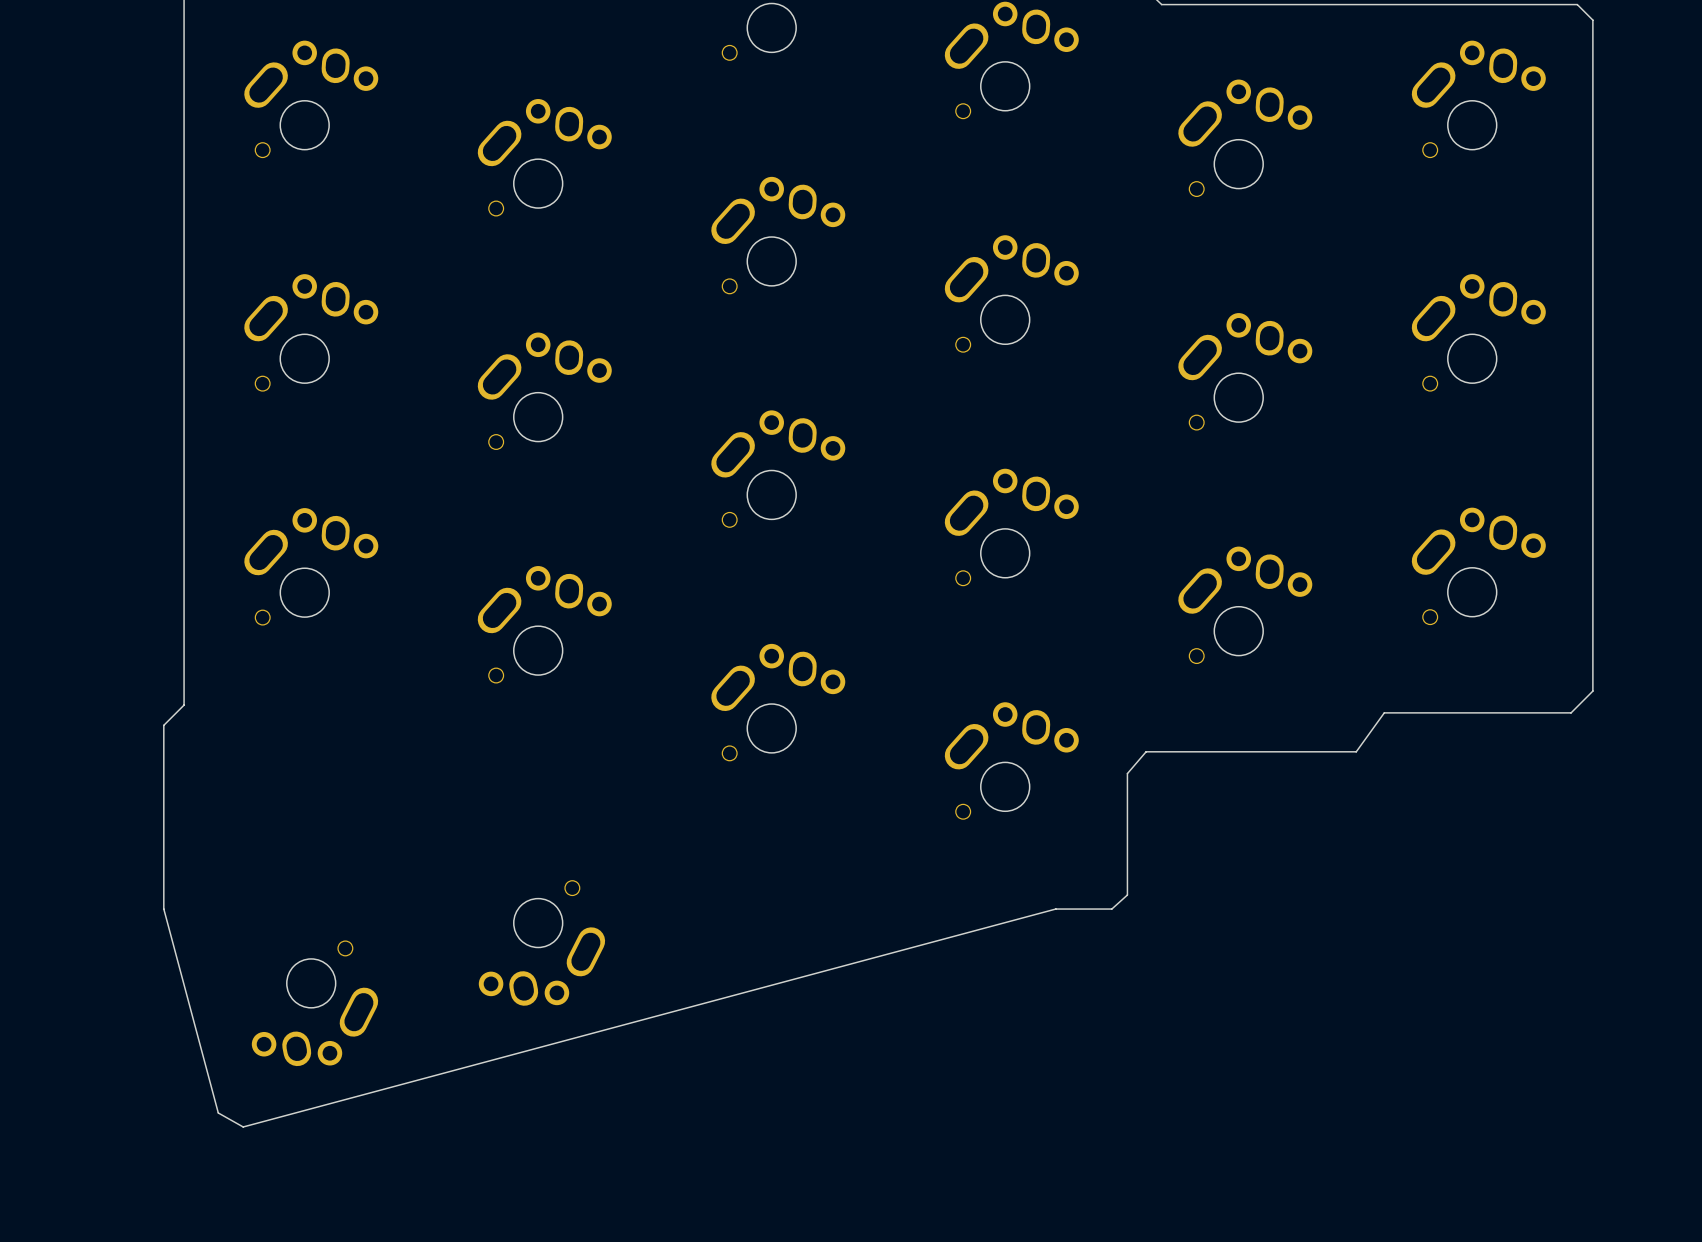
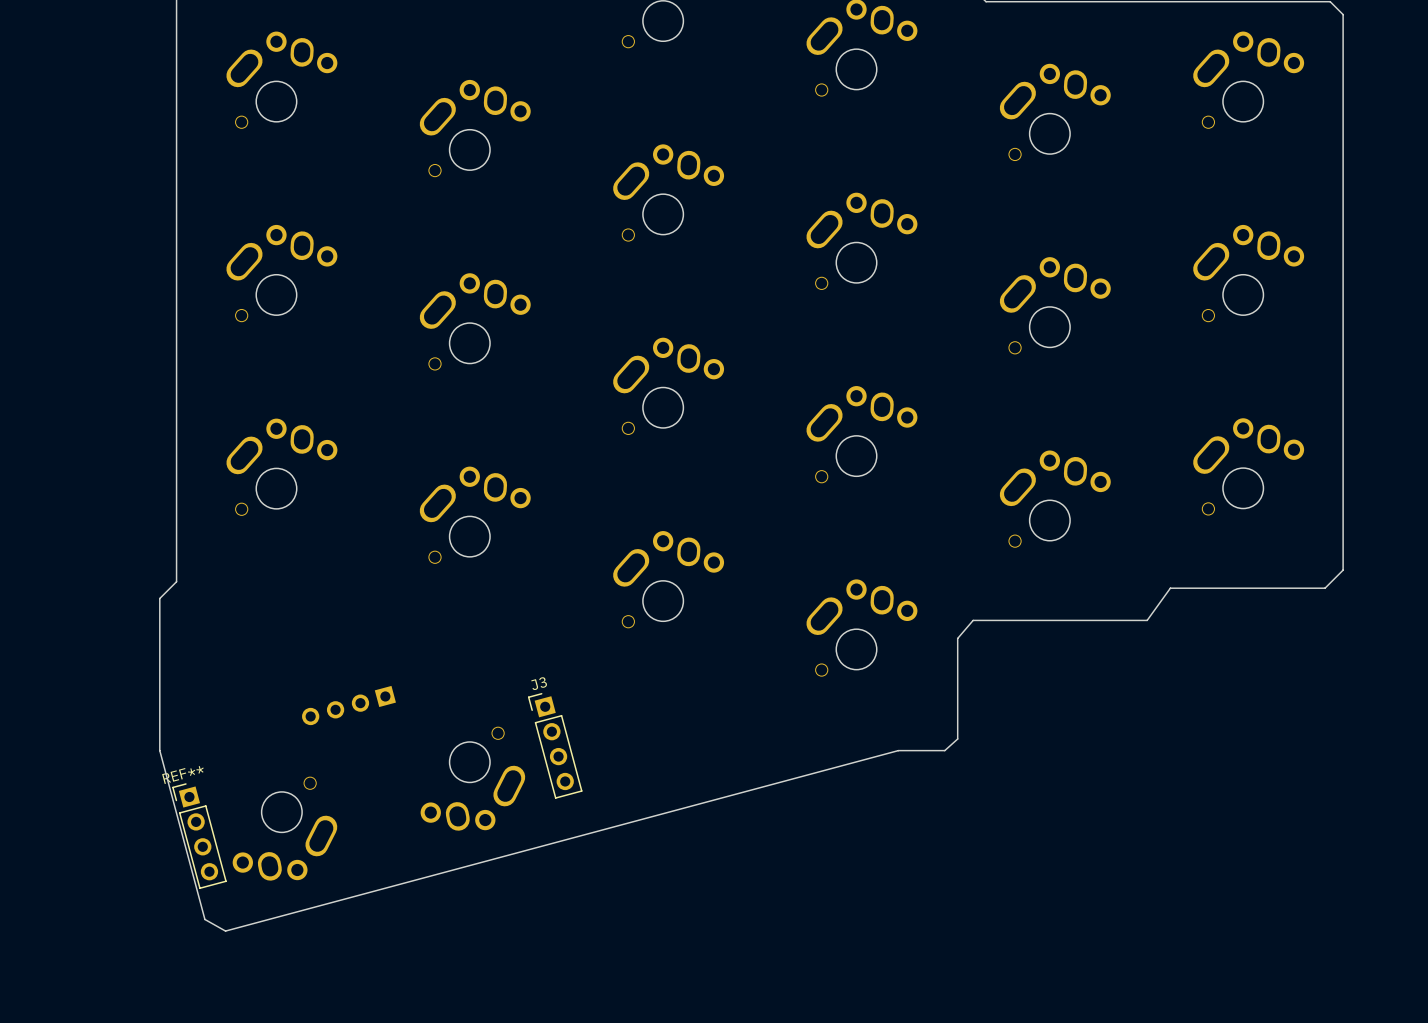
part: none -> (348, 705)
J3: none -> (555, 745)
REF**: none -> (199, 836)

